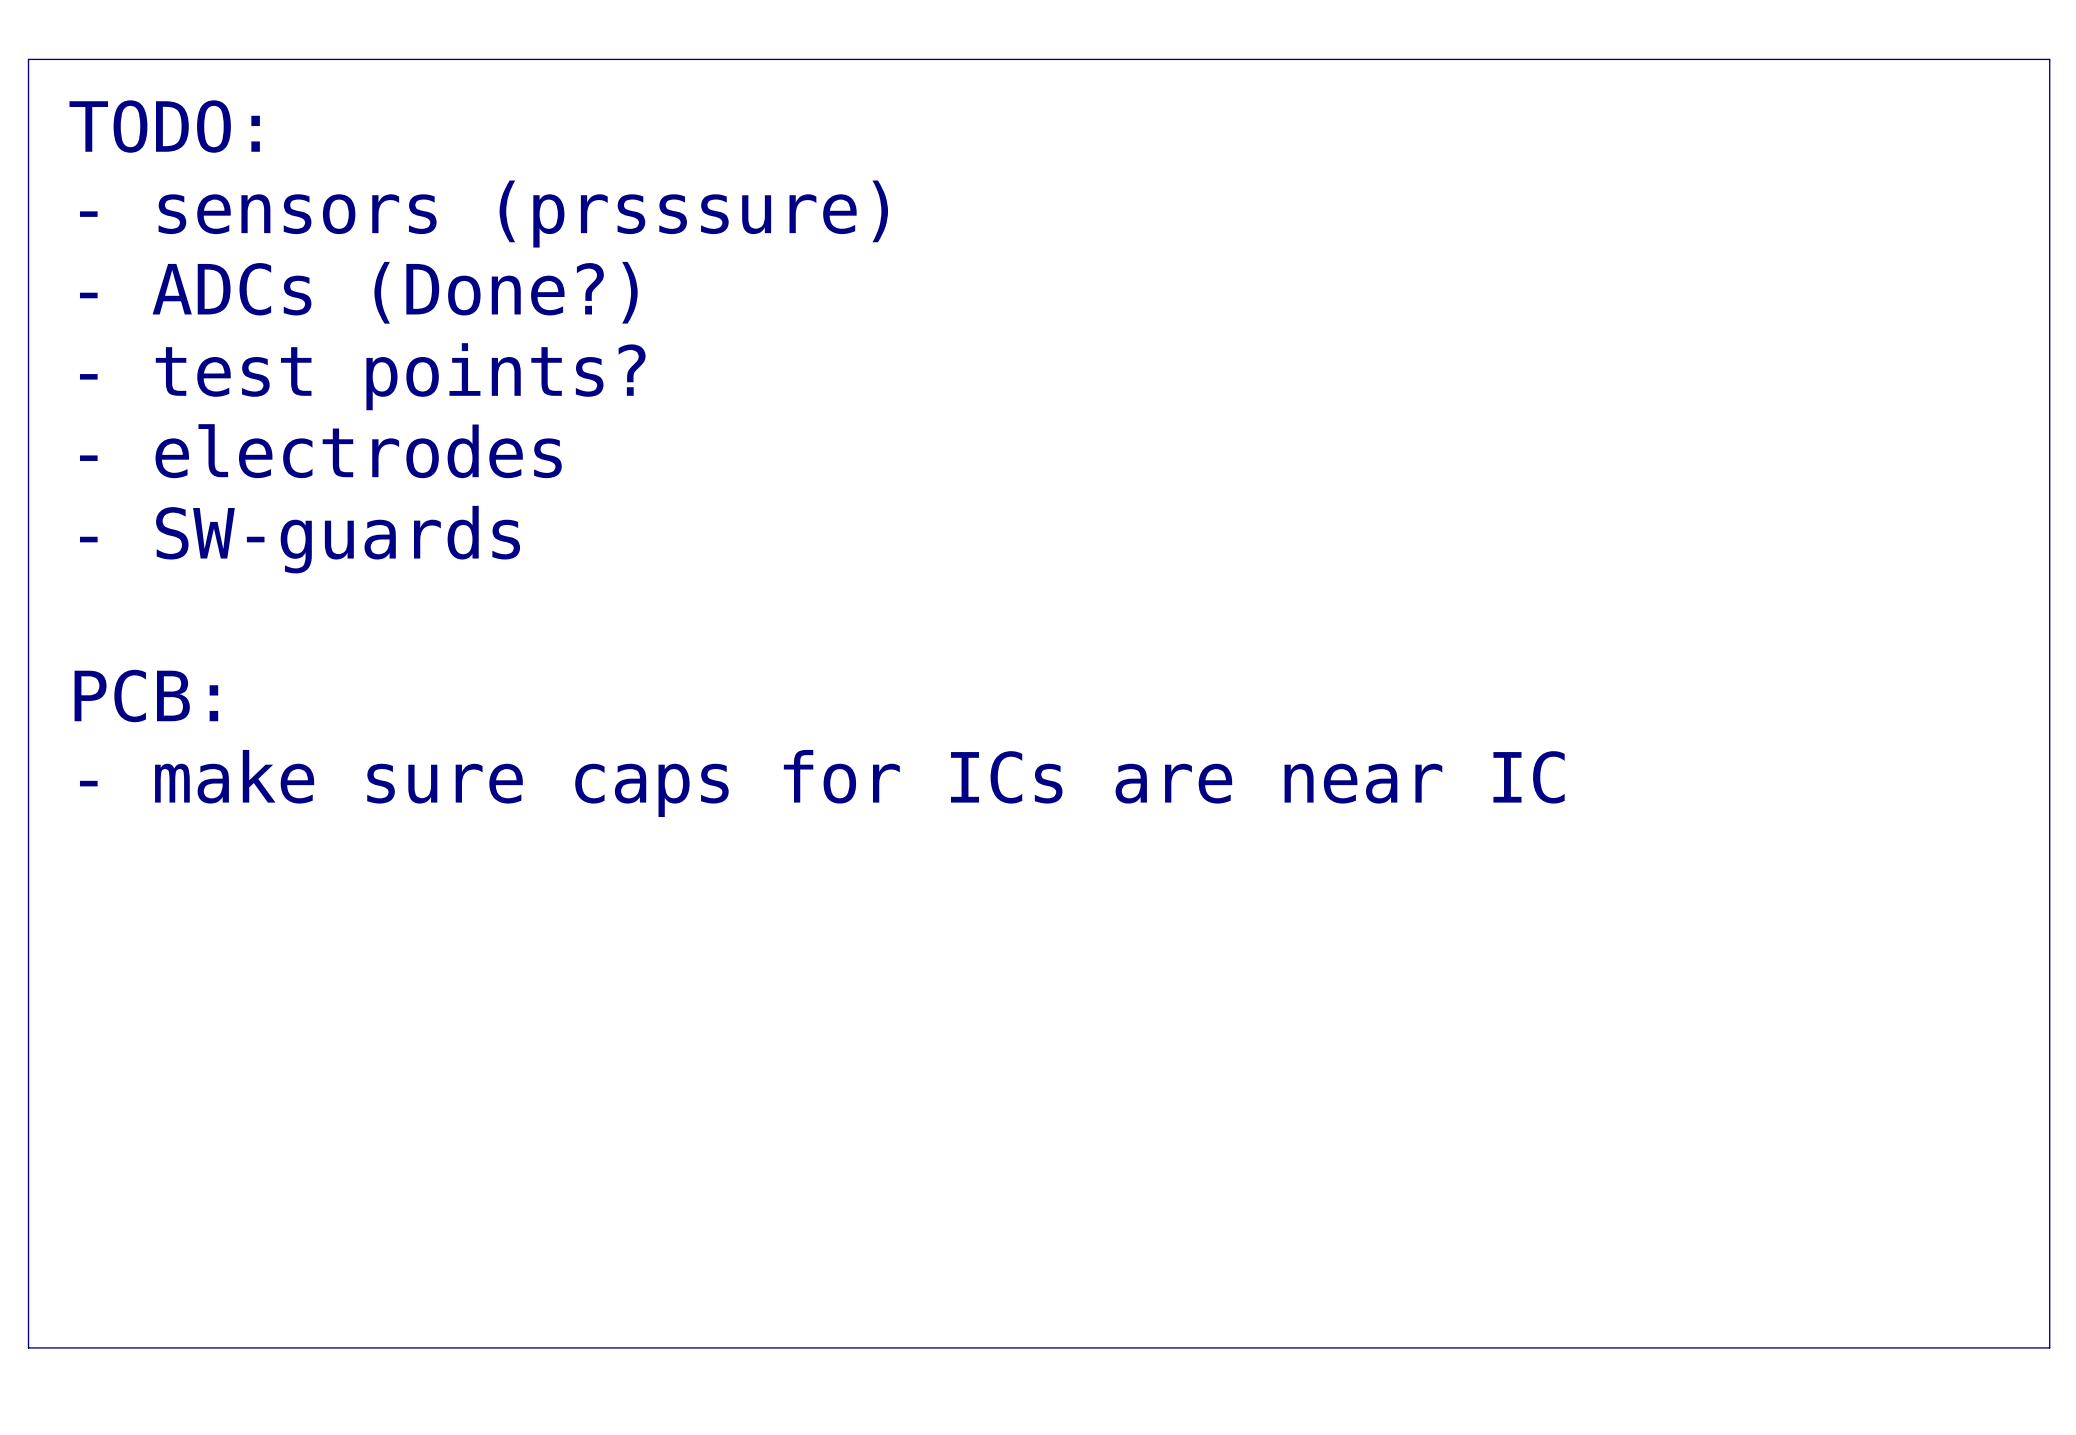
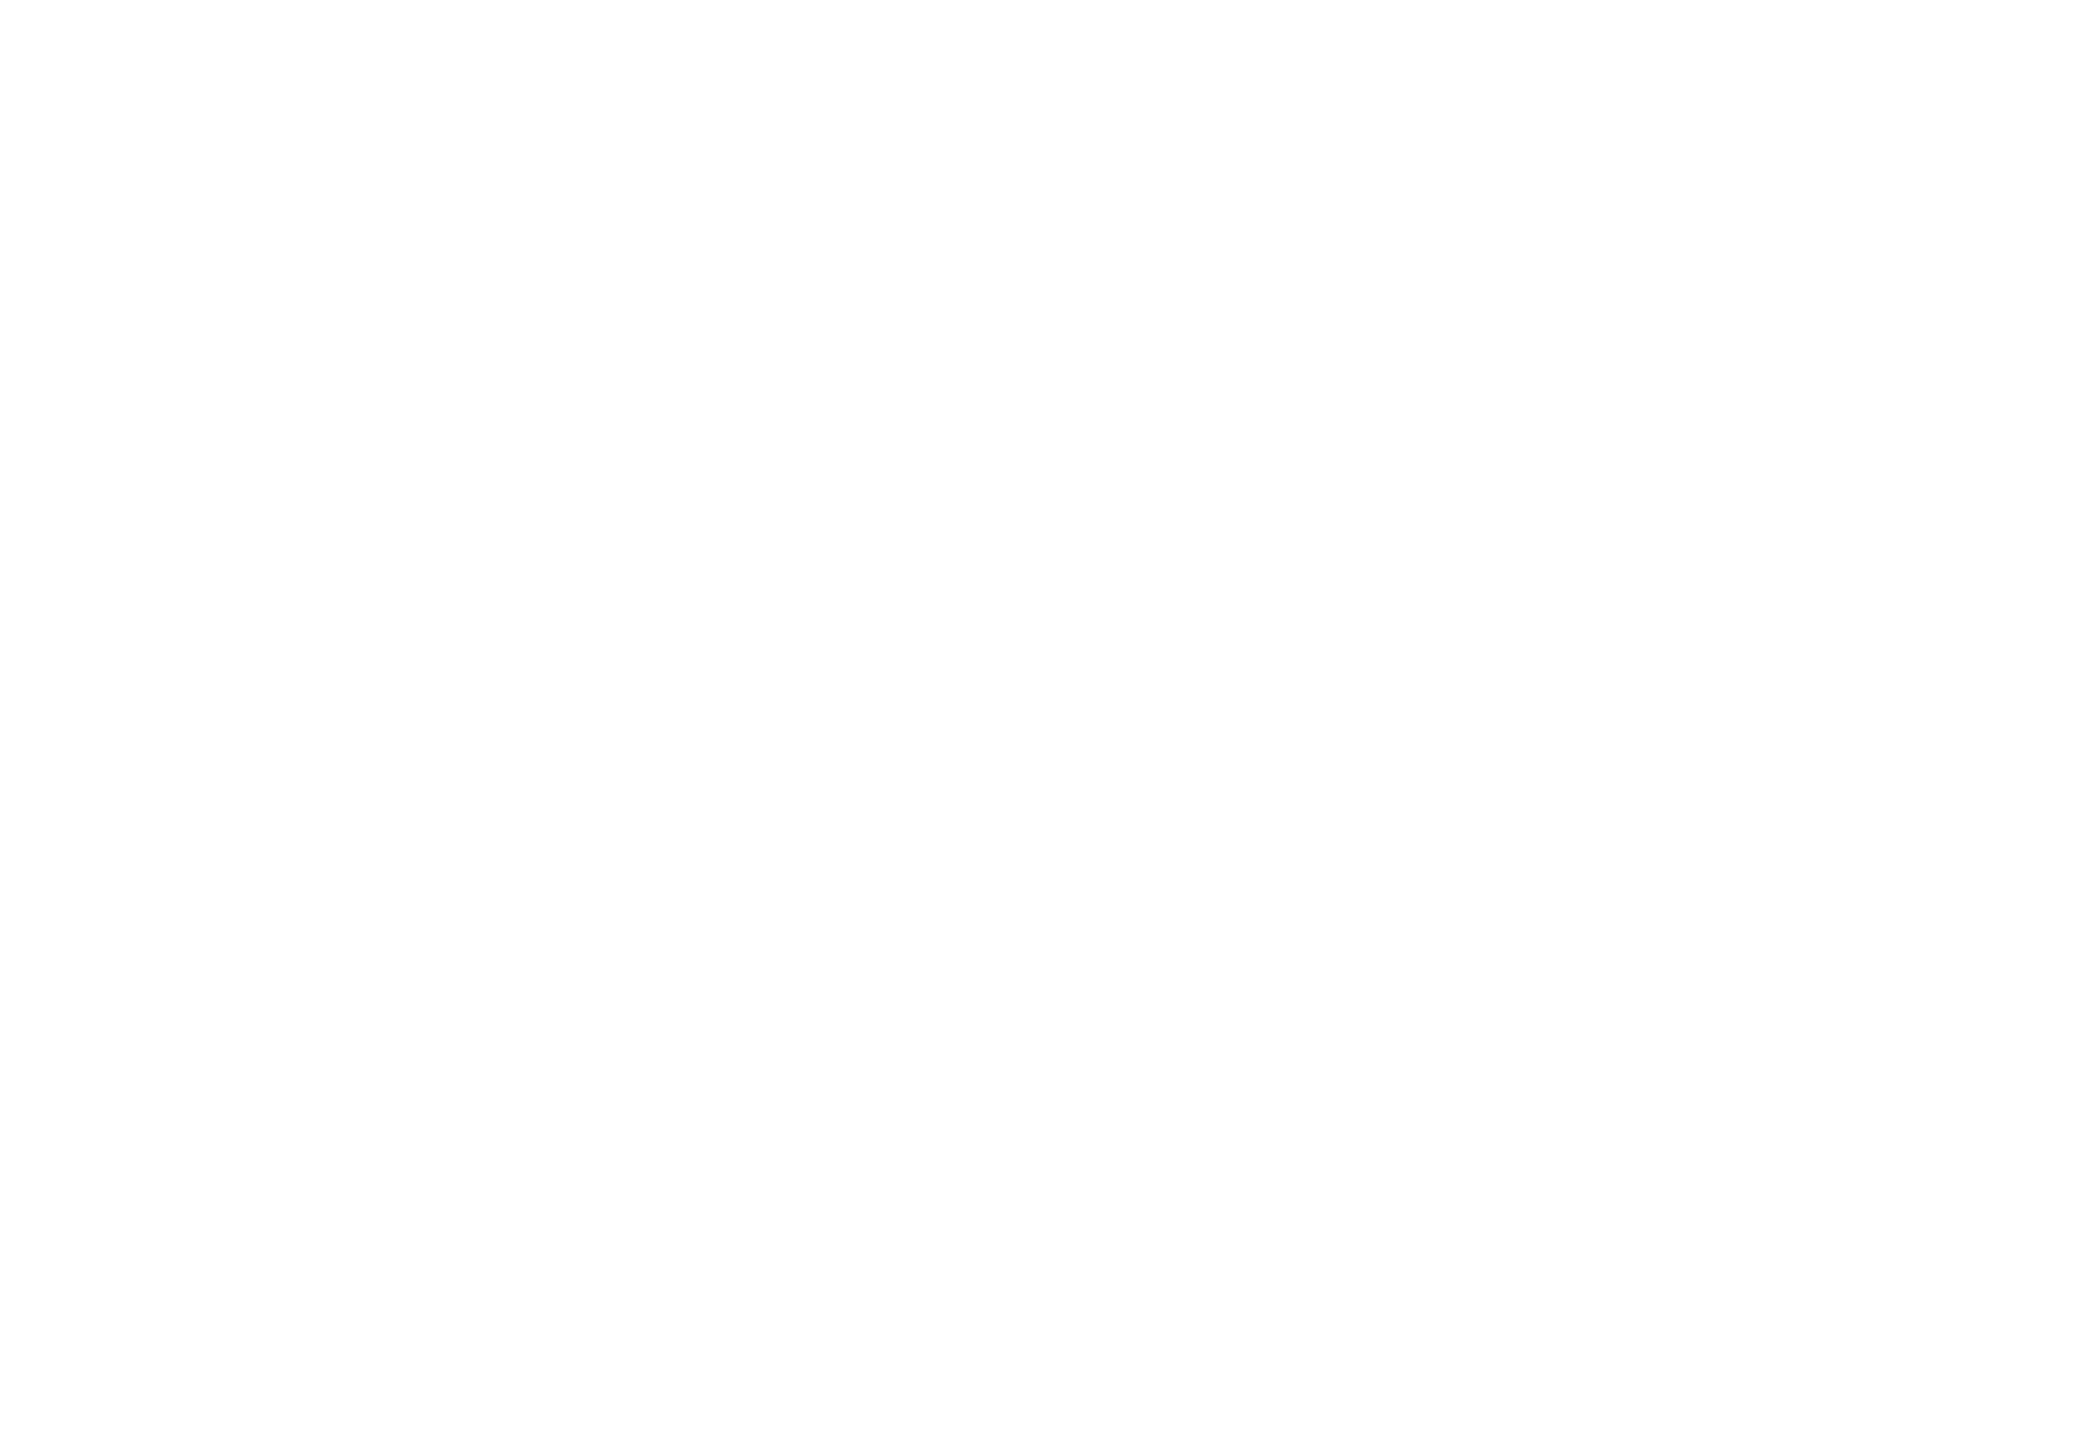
line: (28, 59) (2049, 59) (2049, 1347) (28, 1347) (28, 59) -> none
text: TODO: (164, 126) -> none
text: - sensors (prsssure) (484, 214) -> none
text: - ADCs (Done?) (358, 292) -> none
text: - test points? (362, 376) -> none
text: - electrodes (320, 451) -> none
text: - SW-guards (300, 539) -> none
text: PCB: (146, 696) -> none
text: - make sure caps for ICs are near IC (822, 783) -> none

